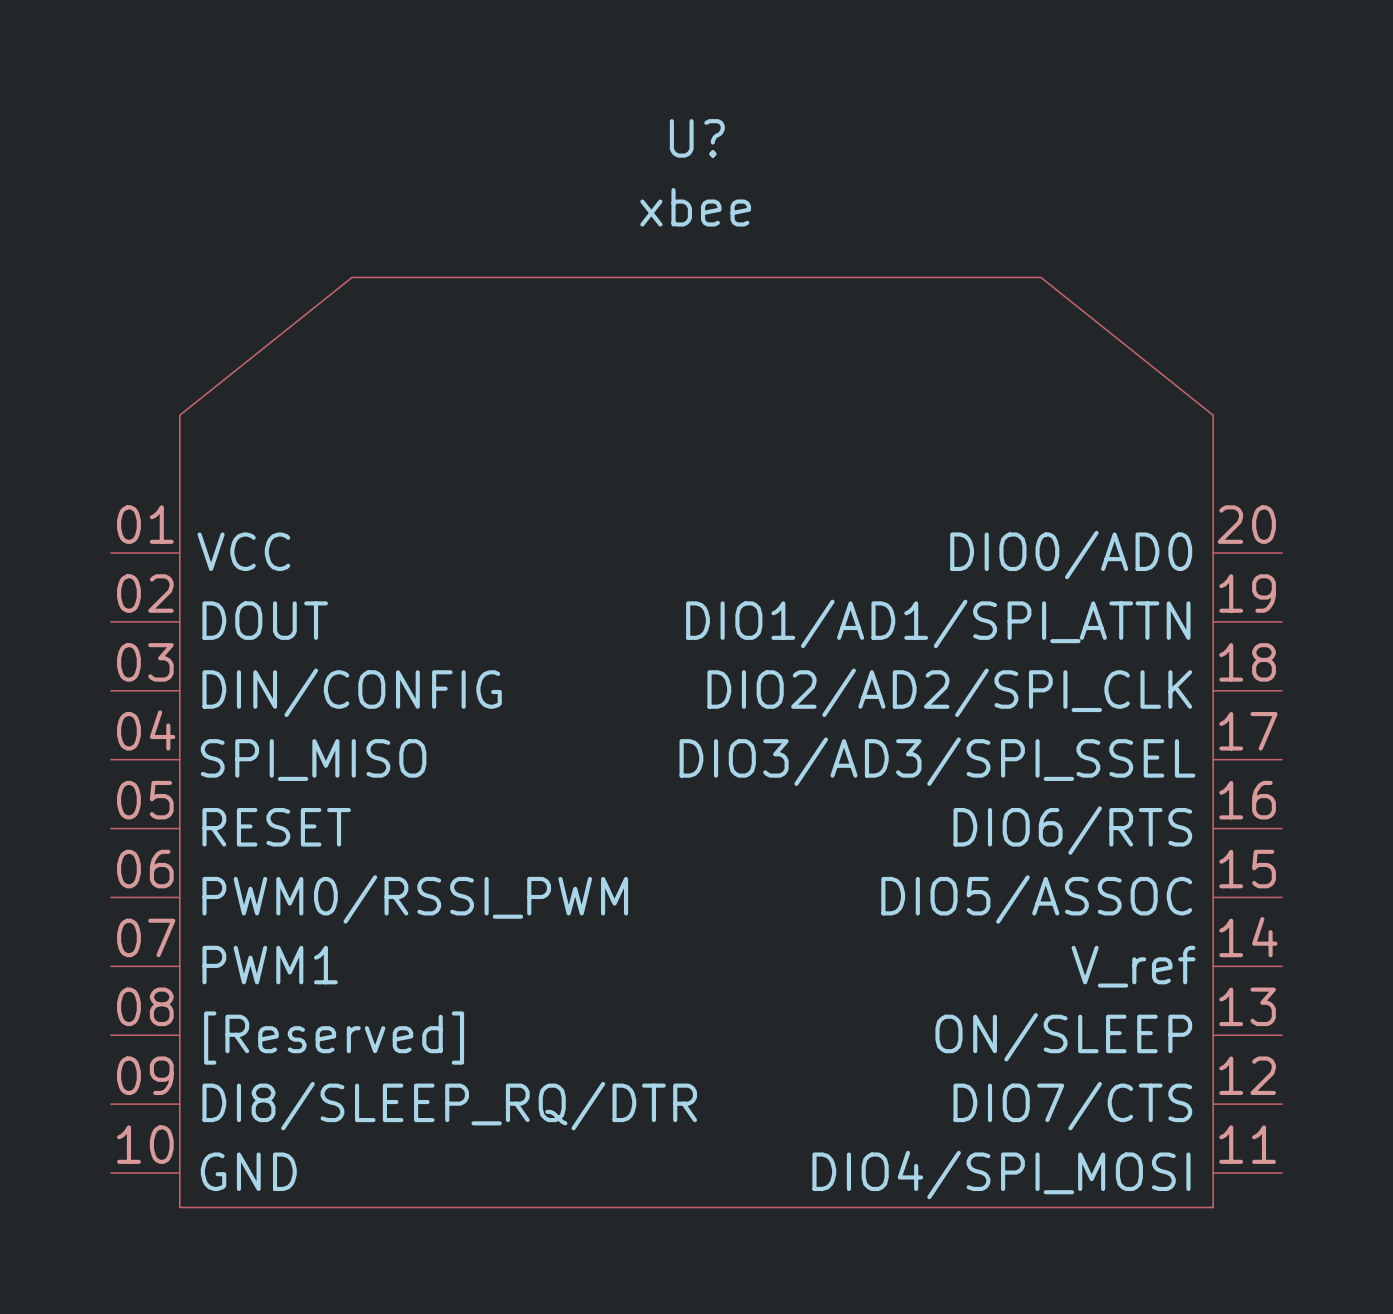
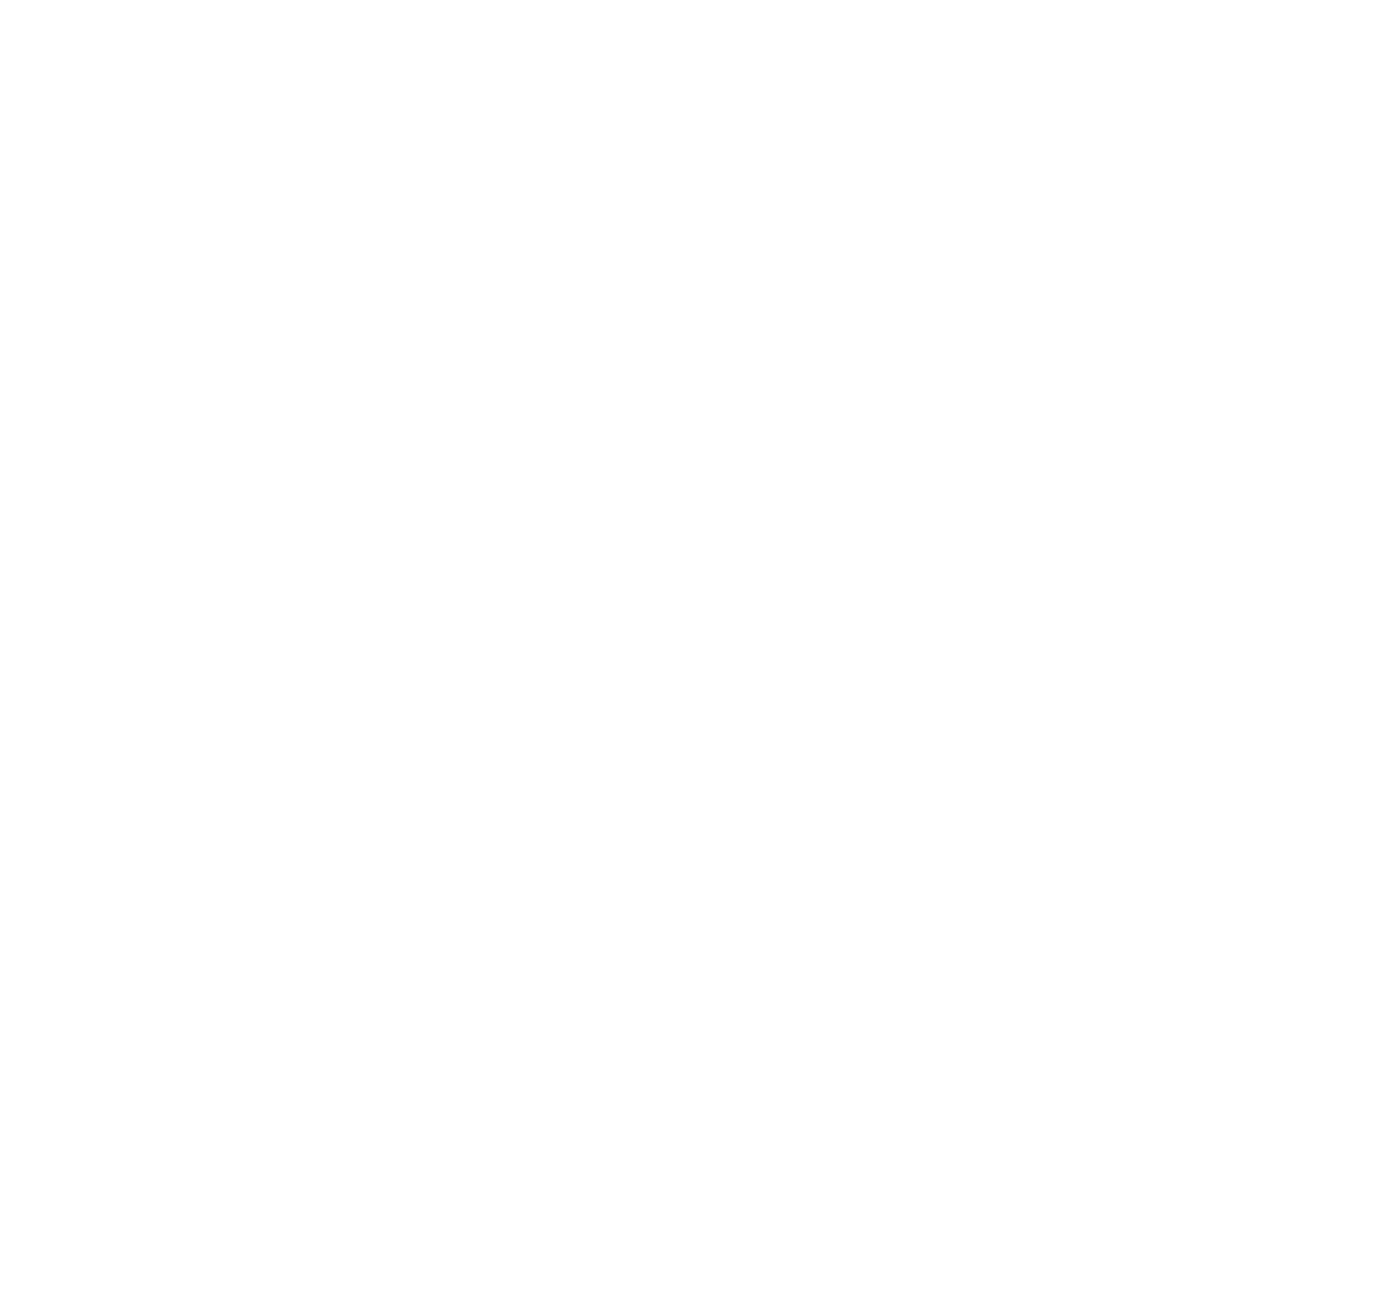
U?: xbee (696, 742) -> none

